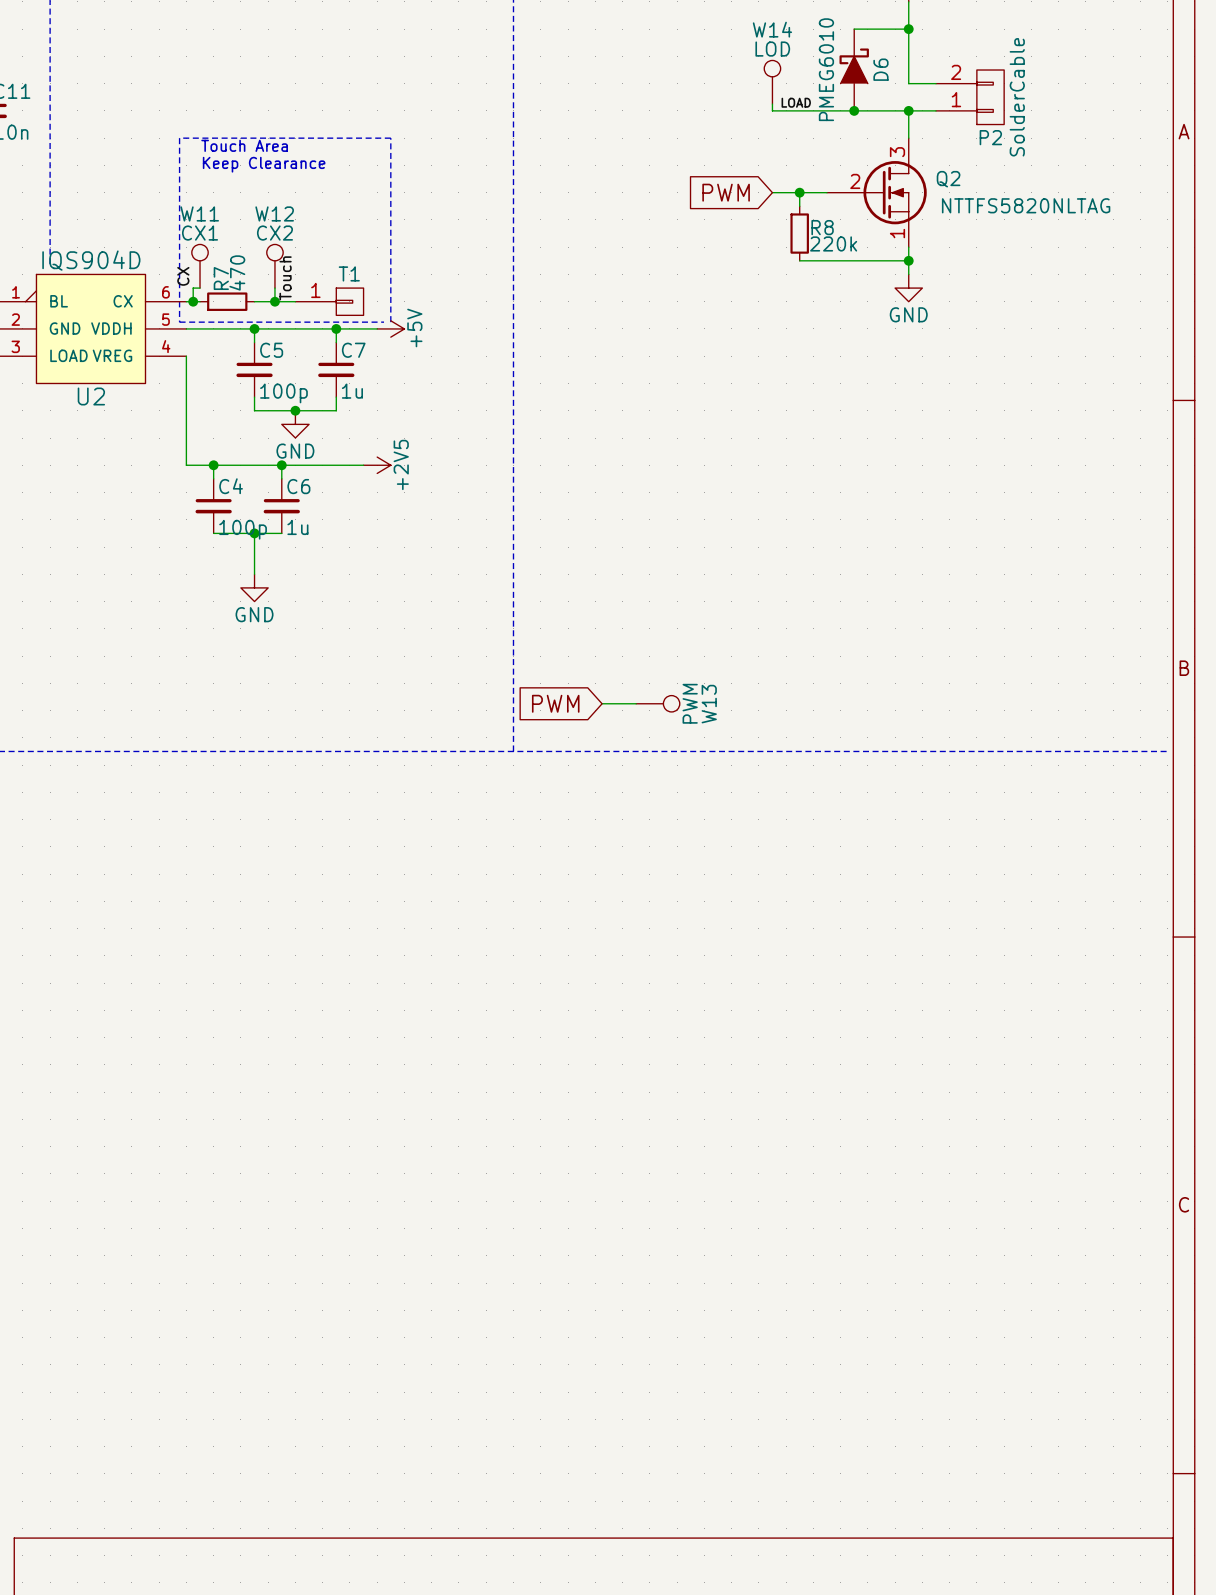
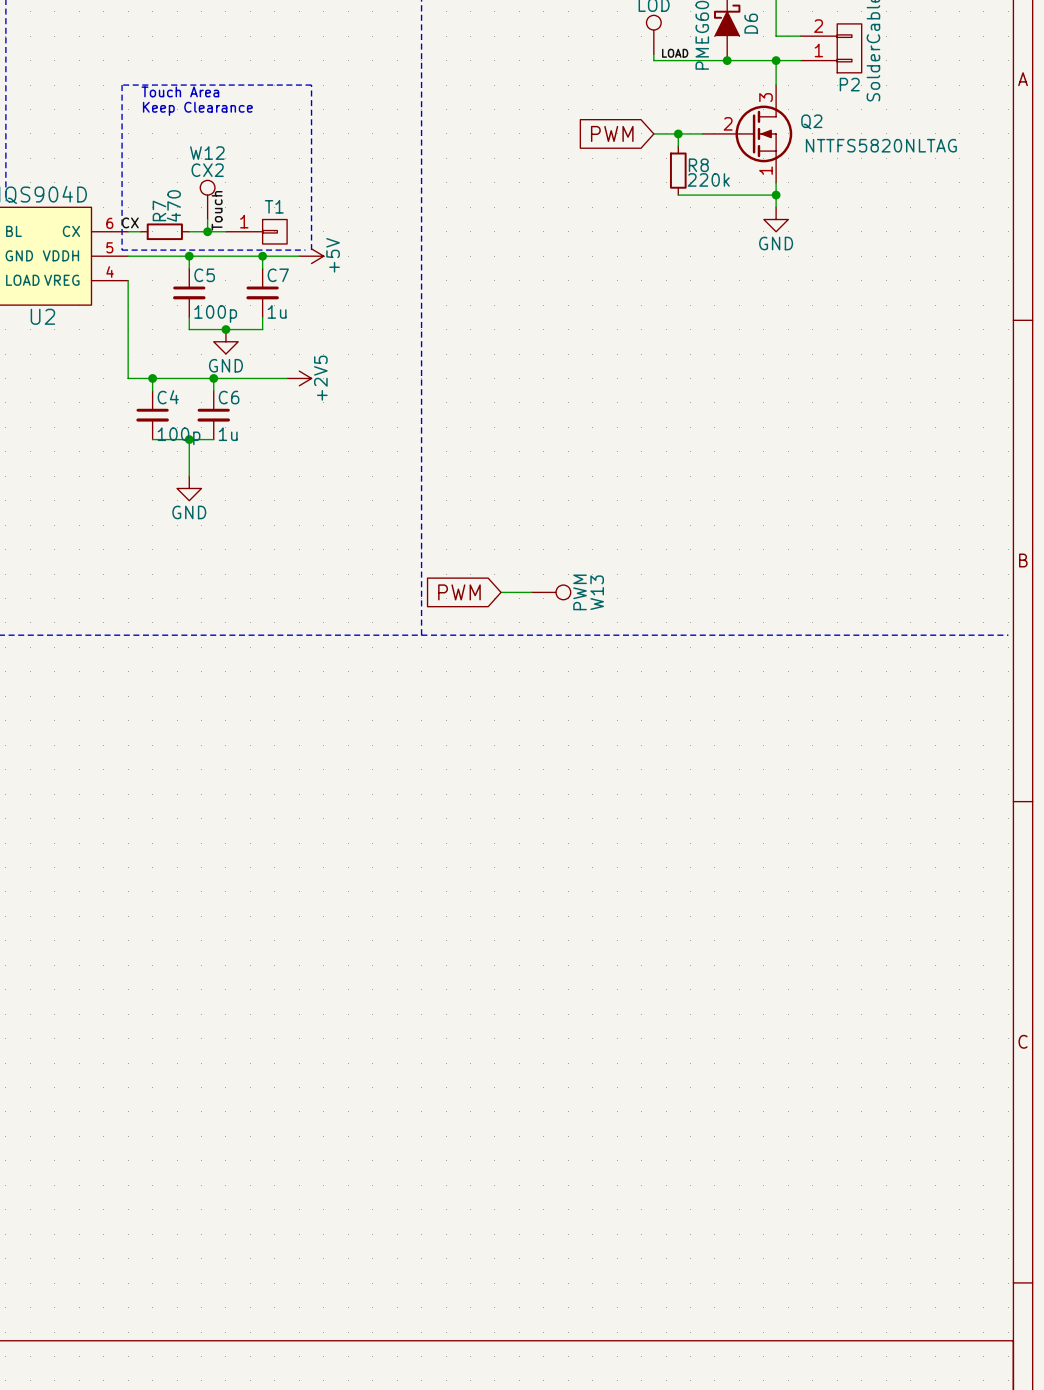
W11: CX1 (200, 266) -> none
label rotation: 0° (183, 276) -> 90° clockwise (130, 222)
wire: (200, 288) (193, 288) (193, 301) -> none
junction: (193, 301) -> none

